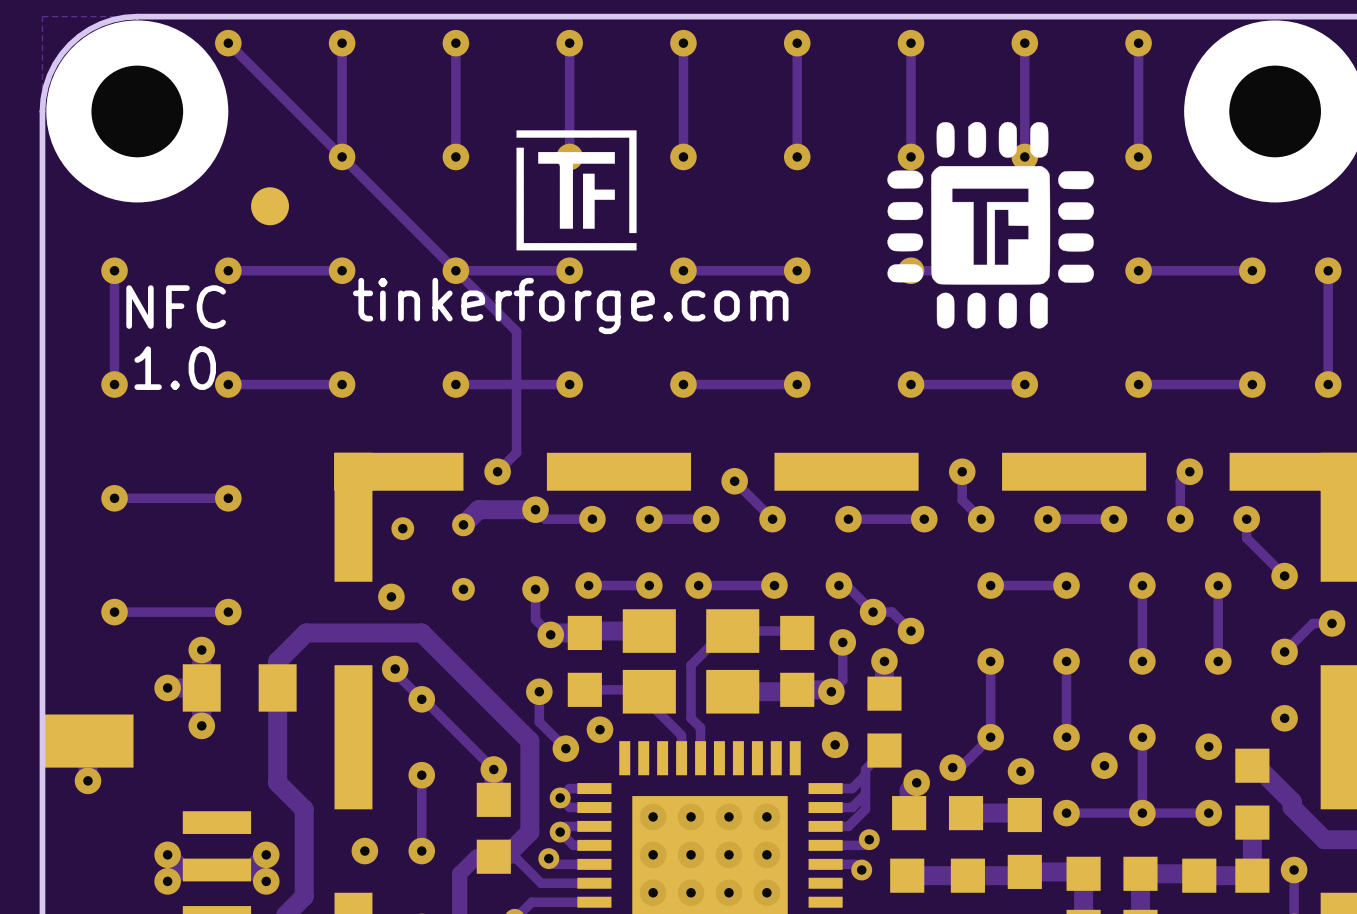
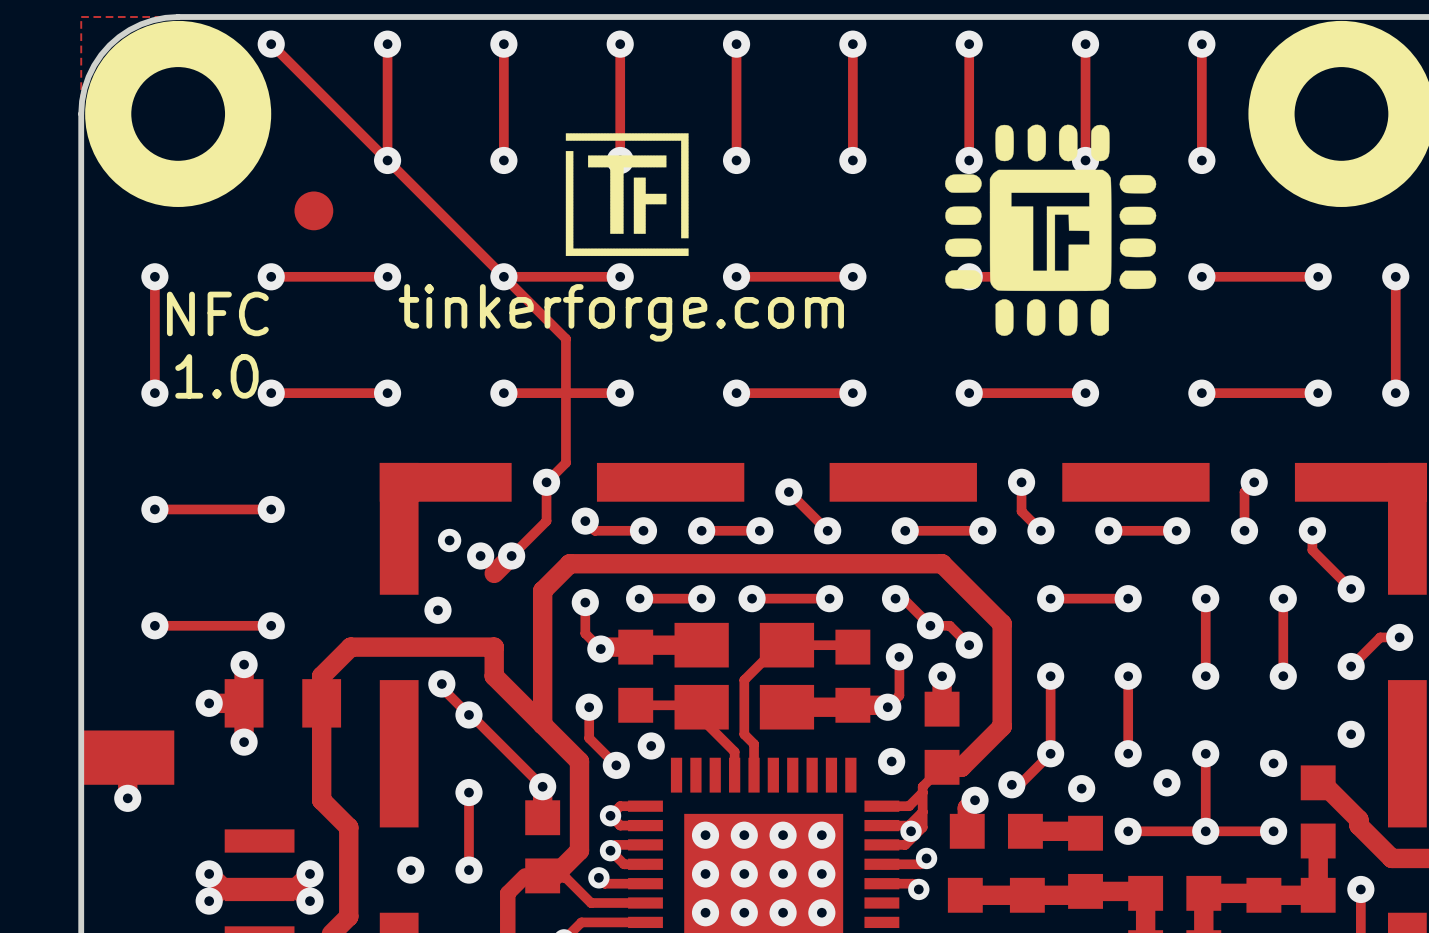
track: none -> (546, 482) (546, 521) (494, 573)
track: (535, 509) (478, 509) (463, 524) -> none
via position: (463, 524) -> (511, 555)
via: none -> (480, 555)
via: (463, 589) -> none
track: (421, 632) (529, 741) (529, 744) -> (468, 647) (494, 647) (494, 676) (579, 761)
track: none -> (542, 724) (542, 590) (569, 563) (942, 563) (1002, 623) (1002, 726) (961, 767) (942, 767)
via: none -> (911, 831)

